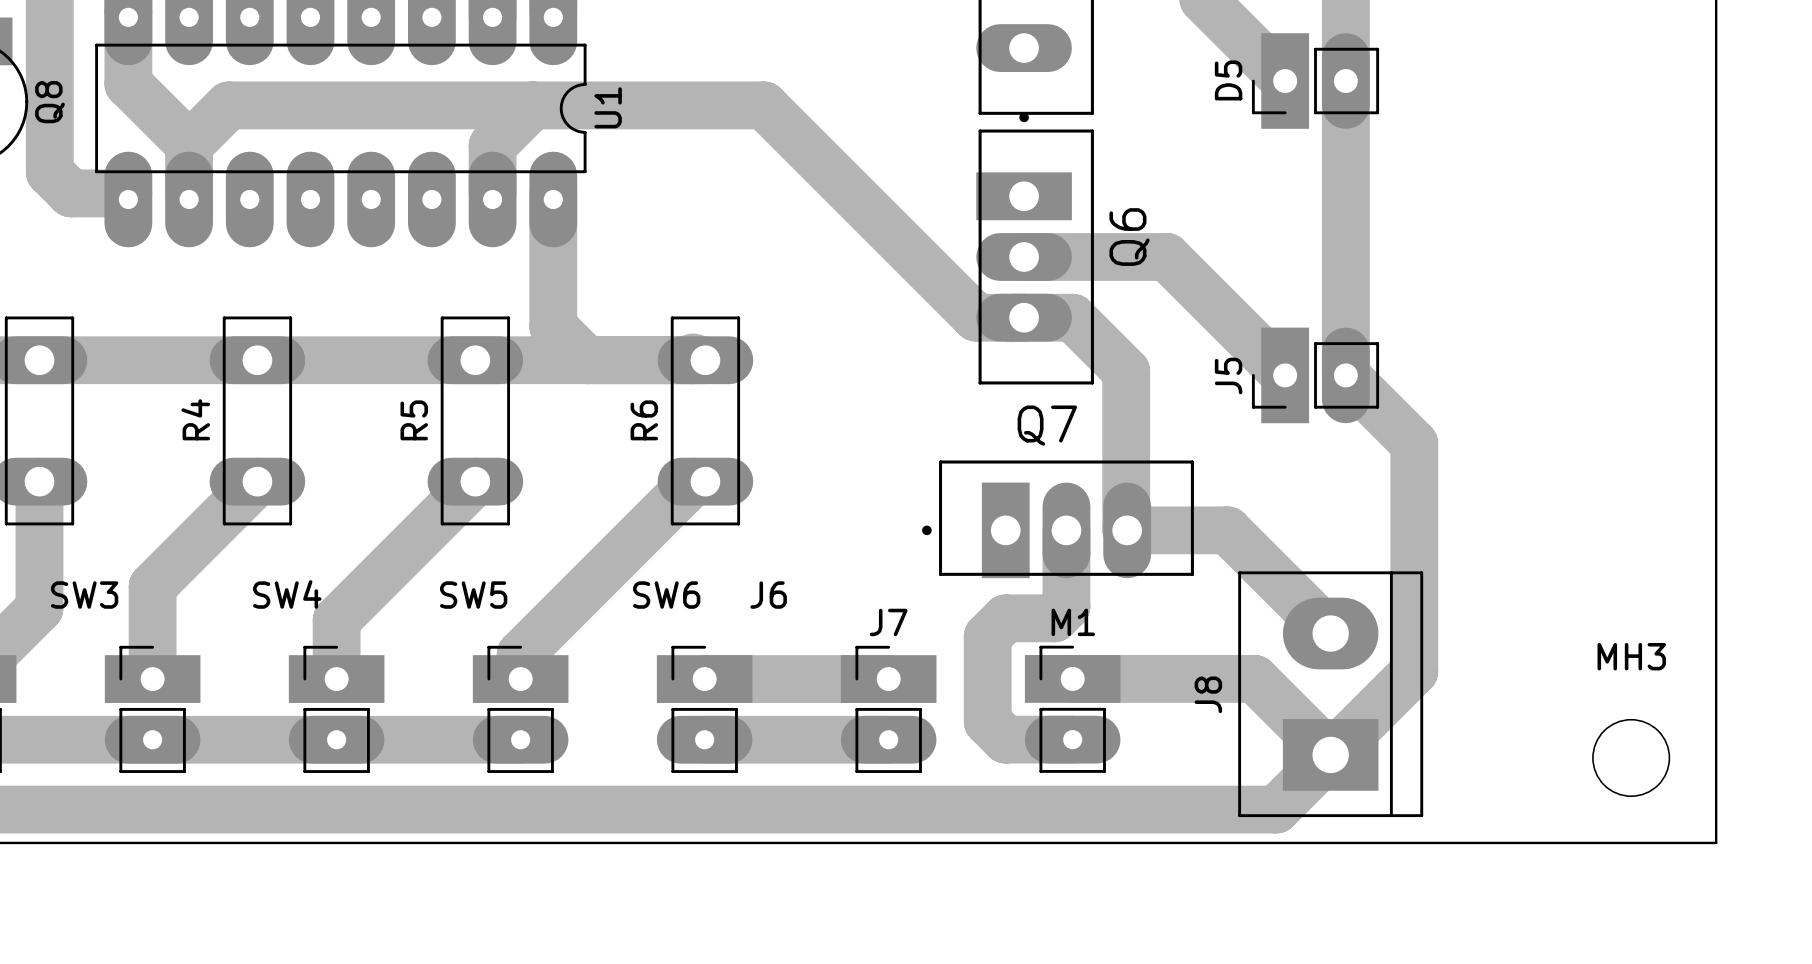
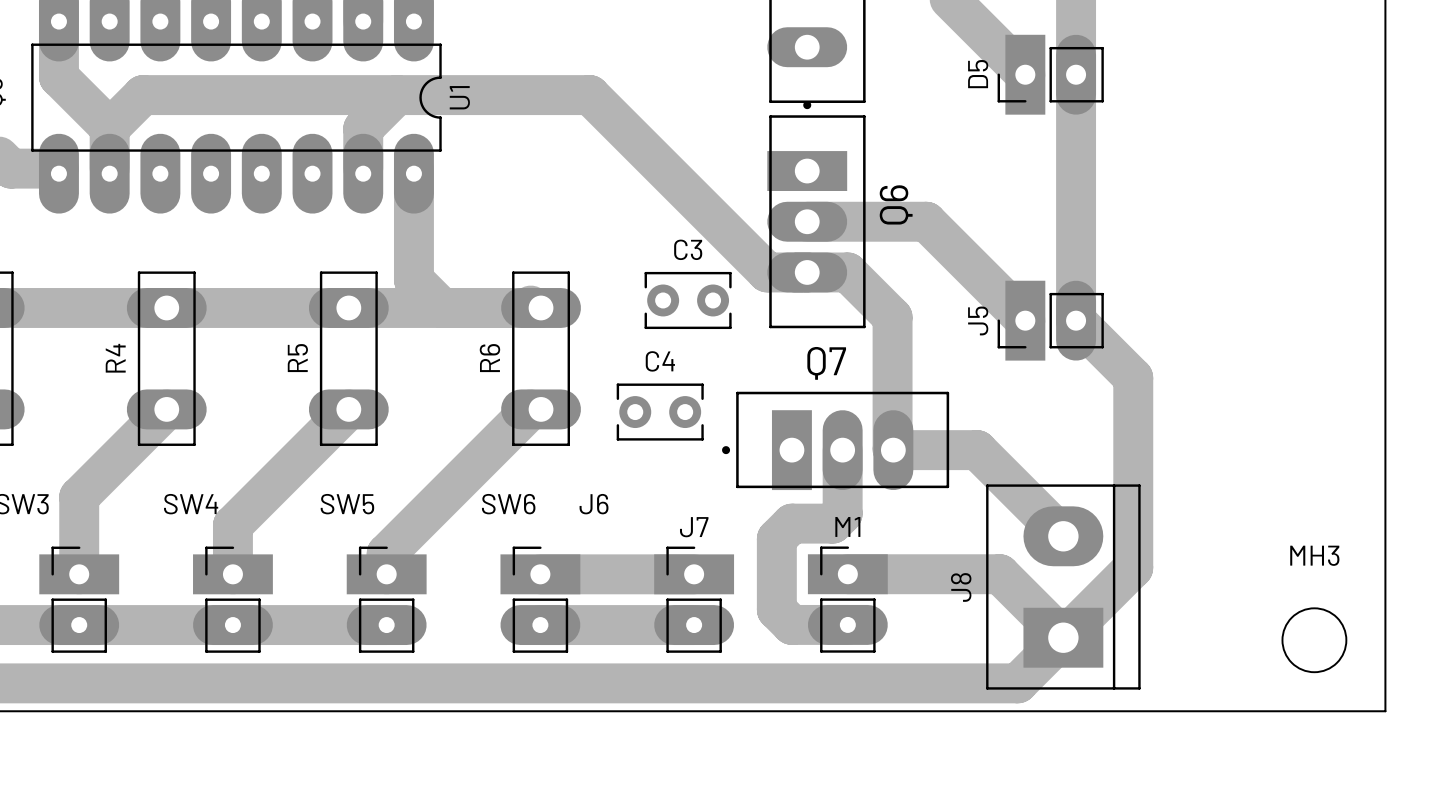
C3: none -> (688, 300)
C4: none -> (660, 412)

